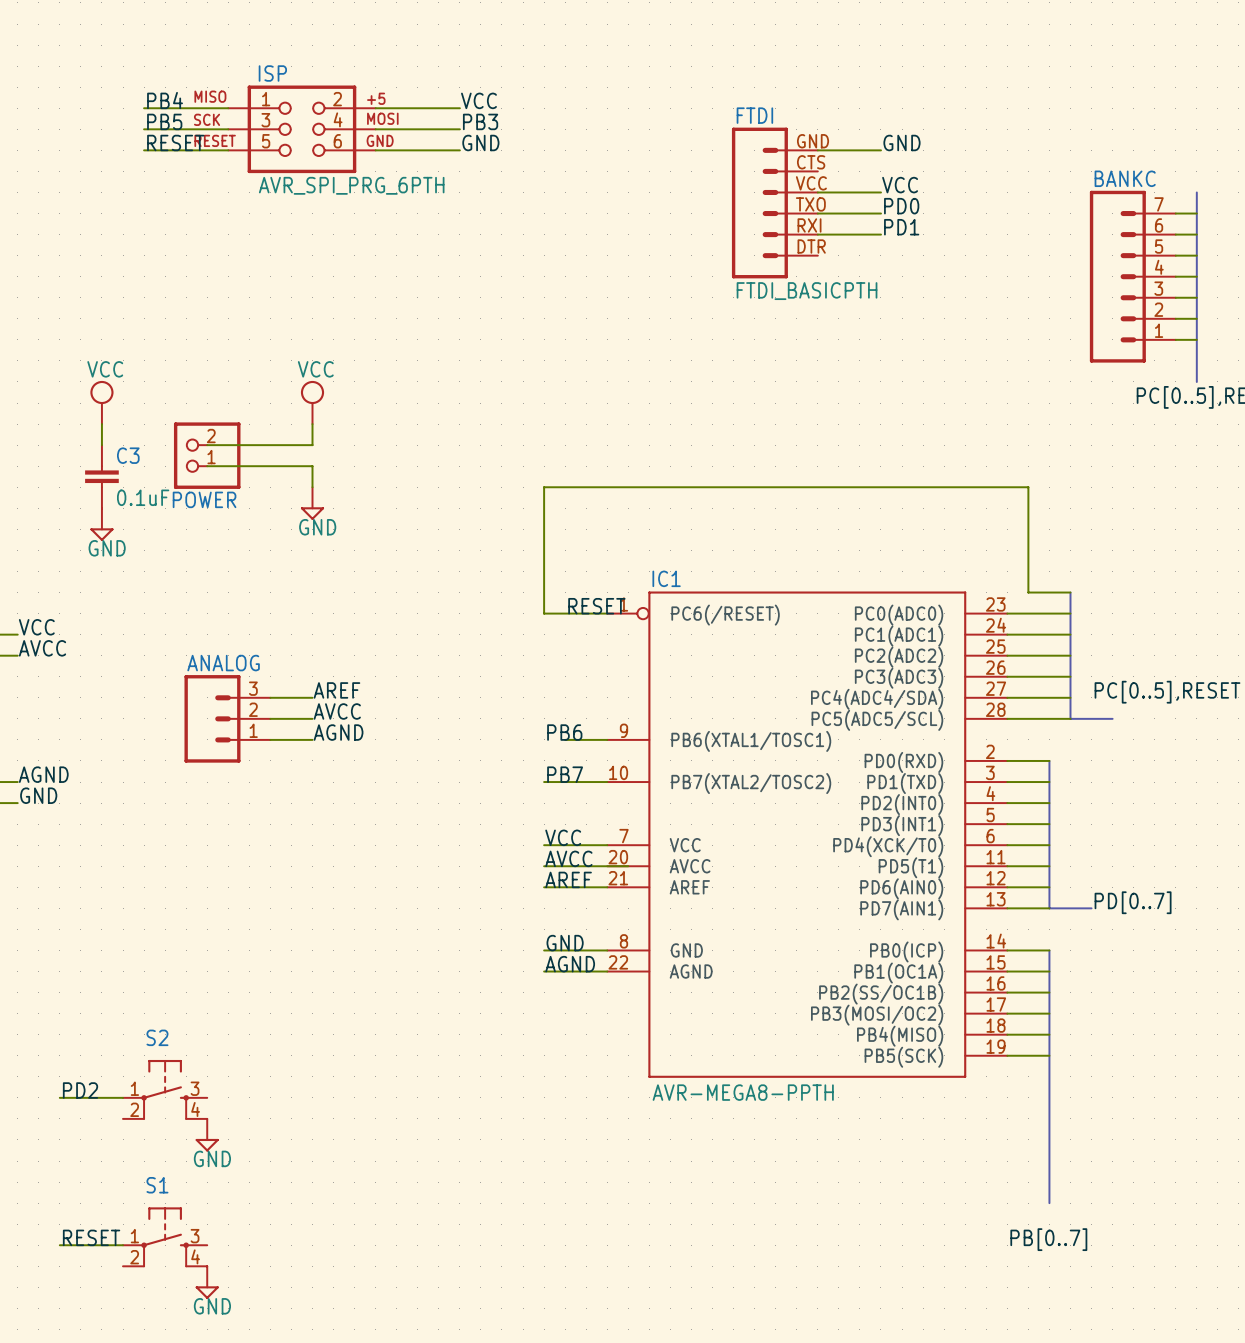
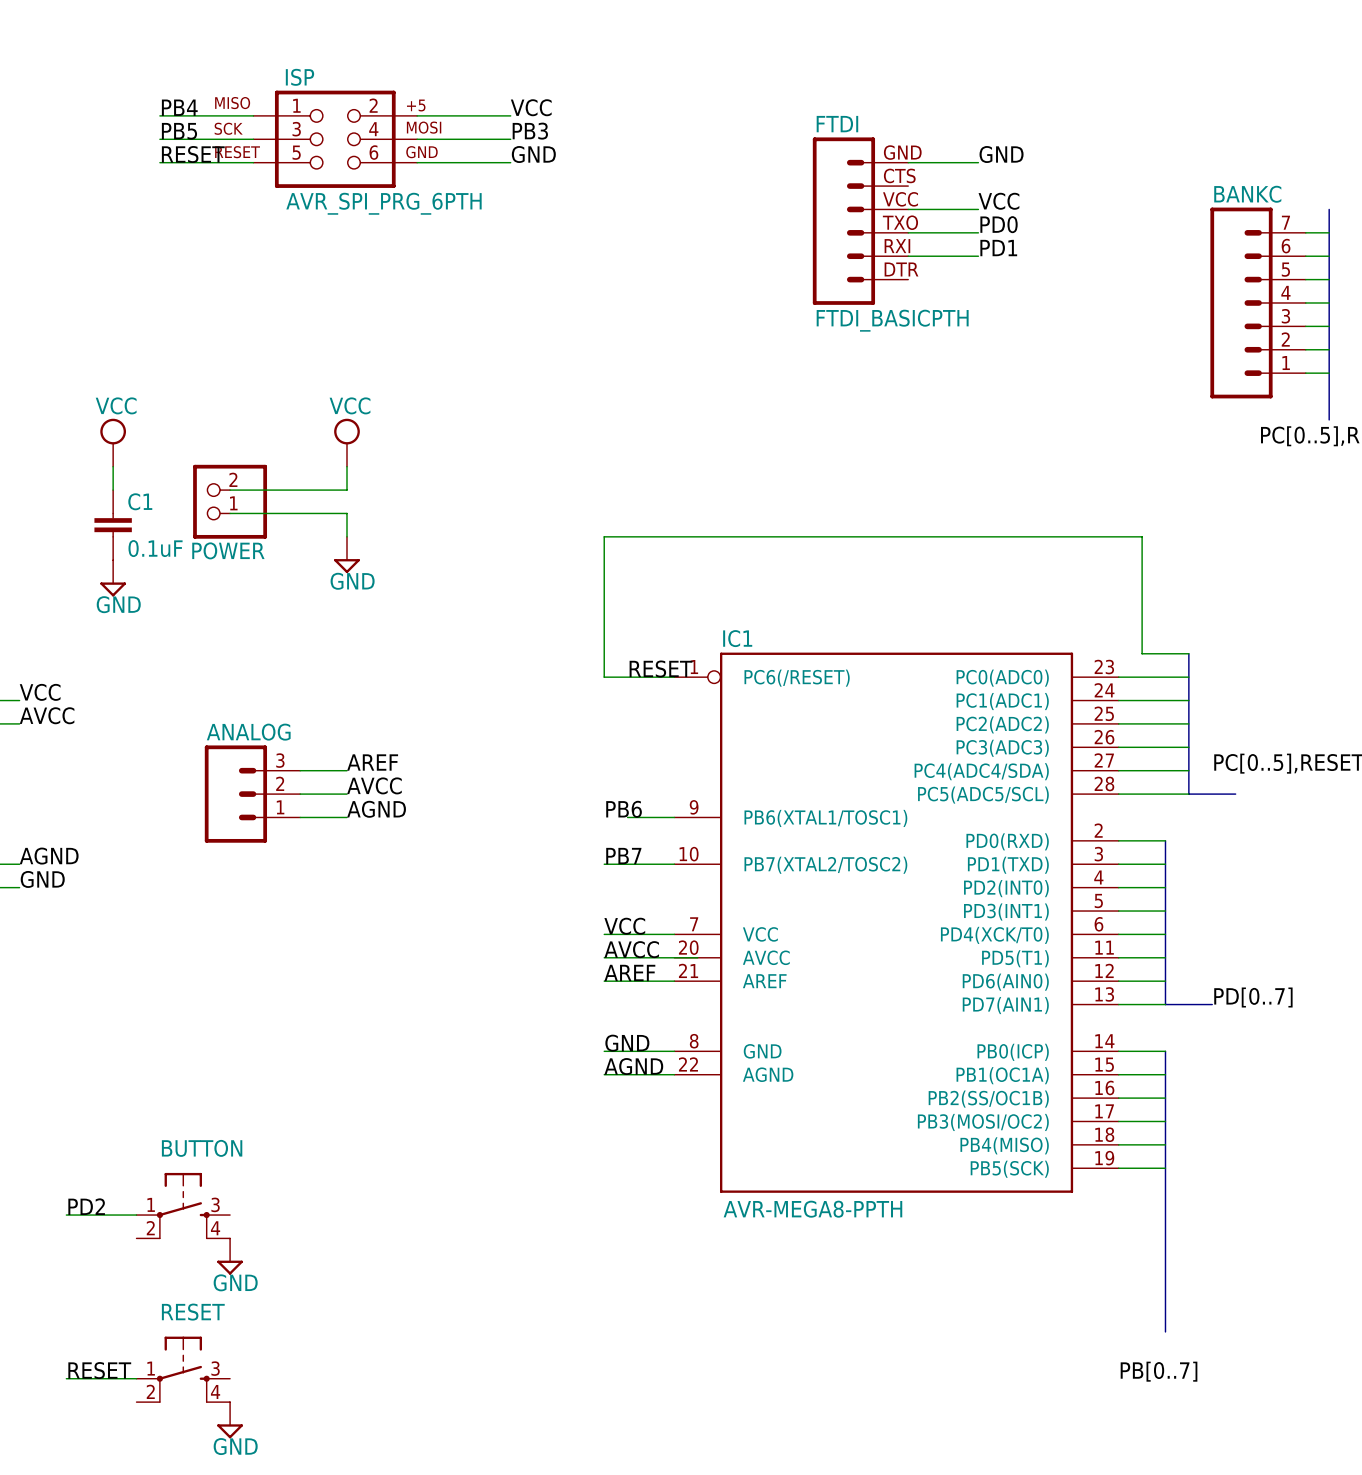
C3 name: C3 (128, 455) -> C1 (140, 501)
S2 name: S2 (157, 1037) -> BUTTON (202, 1148)
S1 name: S1 (157, 1185) -> RESET (193, 1312)

